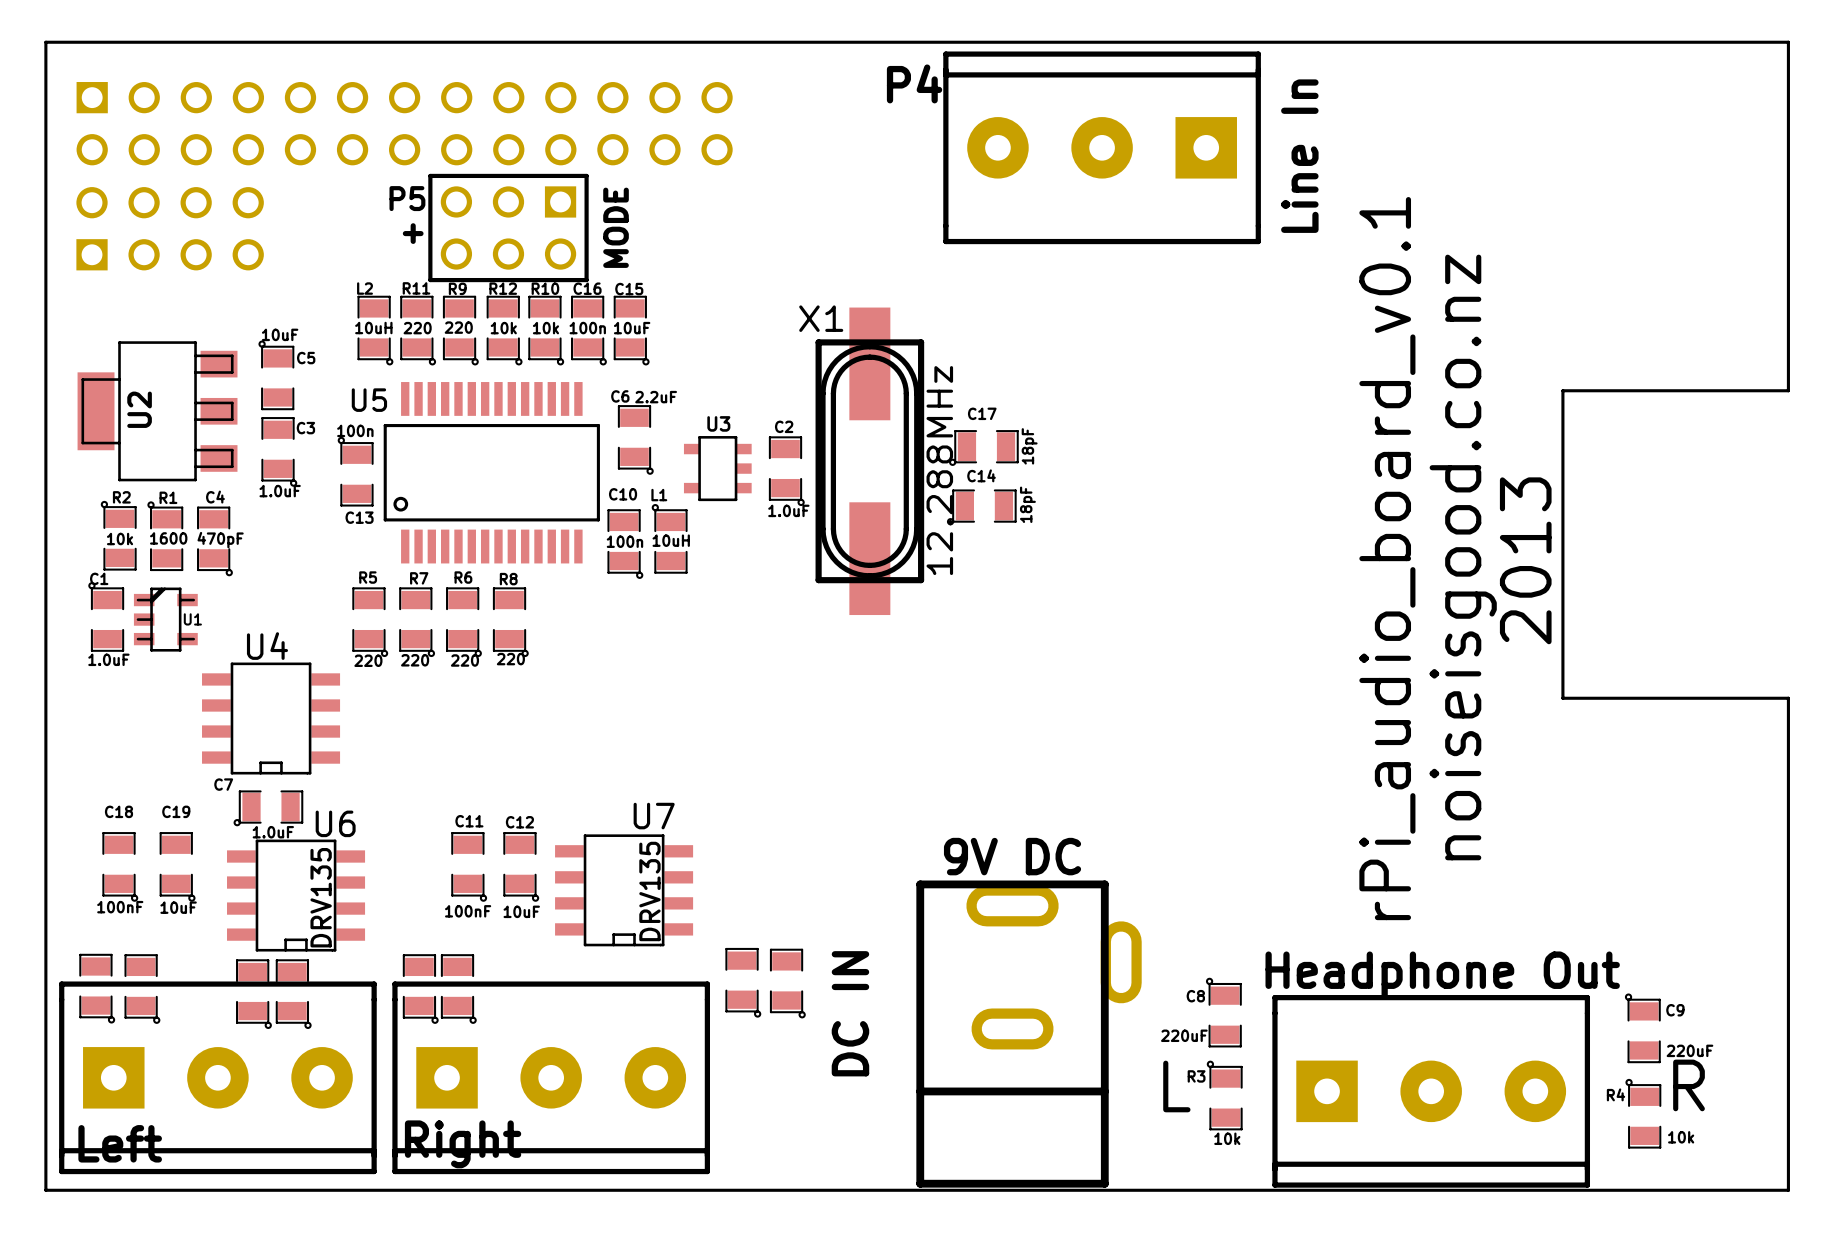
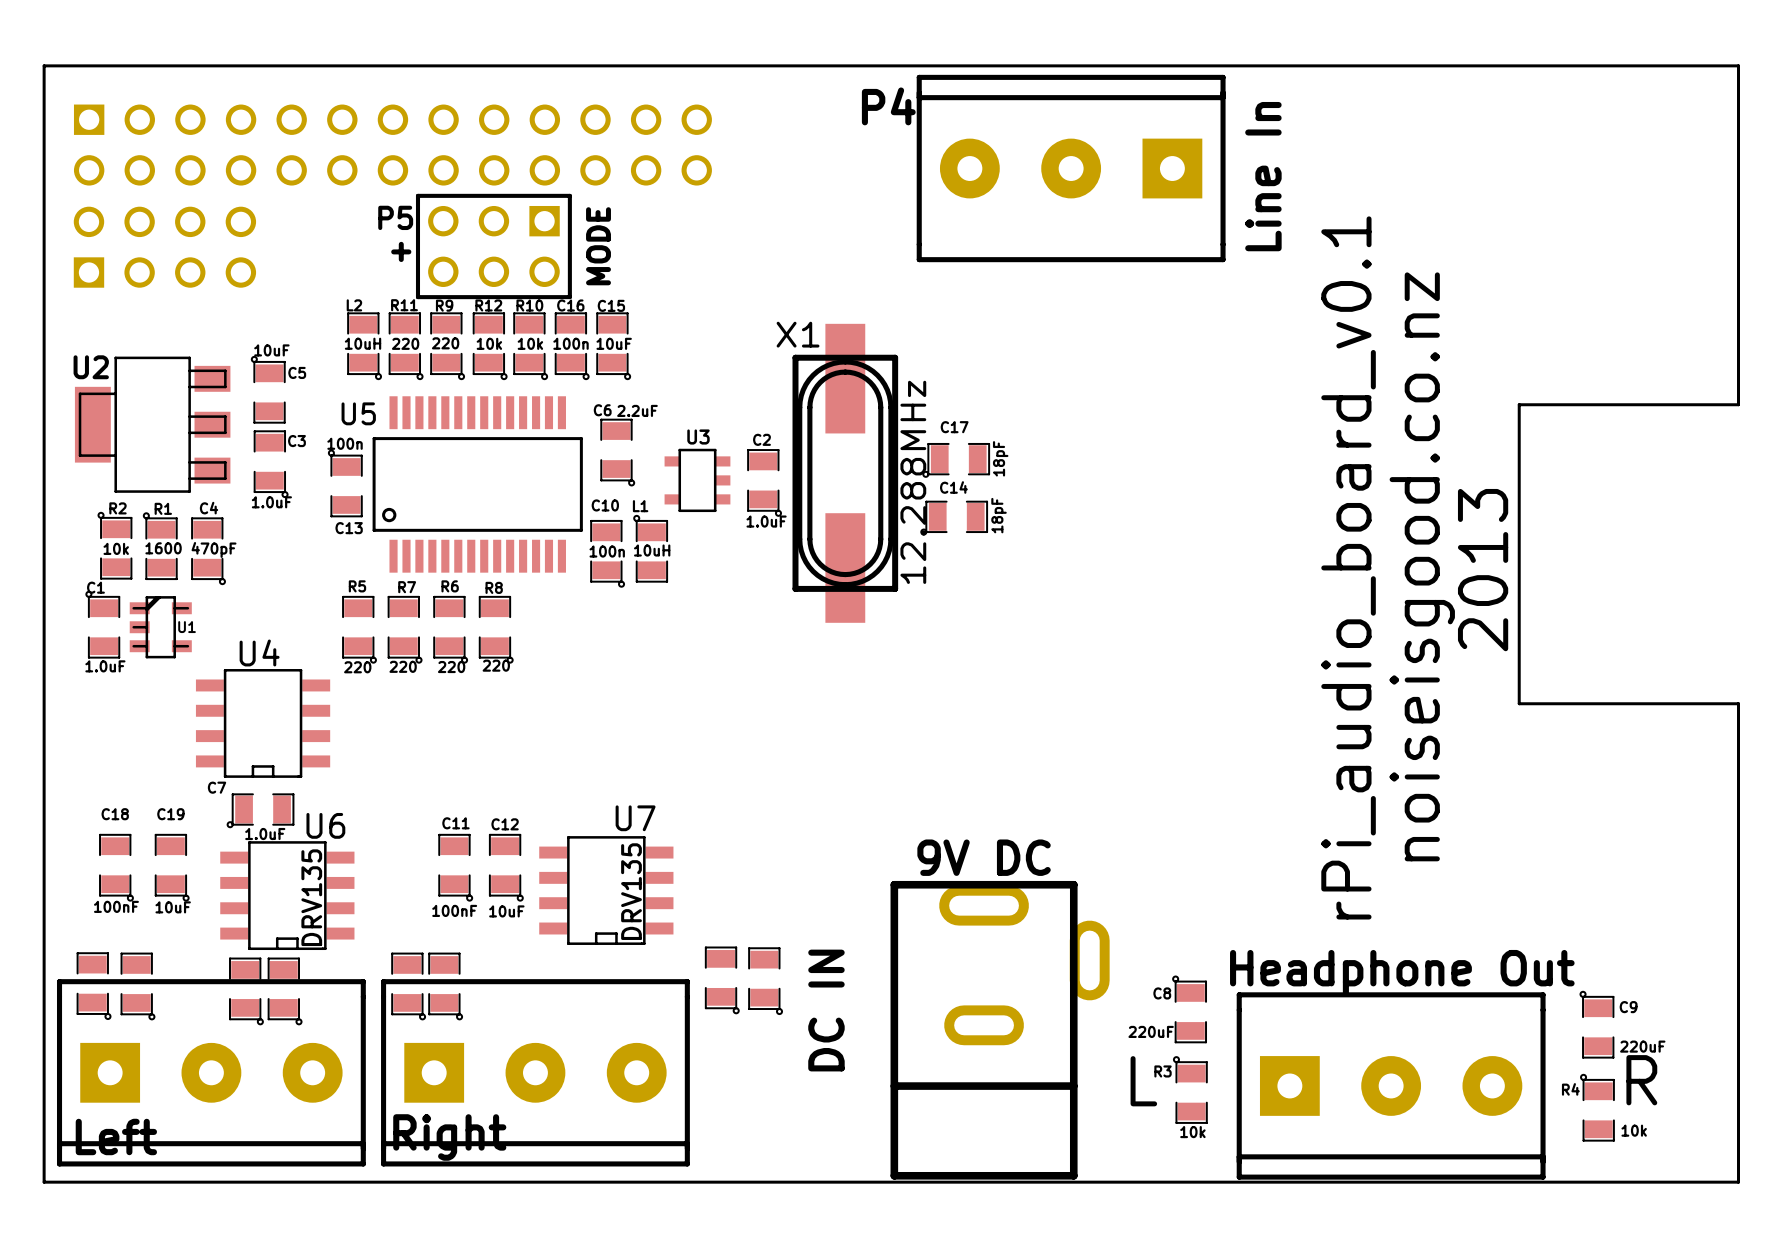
U2 name rotation: 0° (139, 409) -> 90° clockwise (91, 367)
U2 name position: U2 (139, 409) -> U2 (91, 367)

